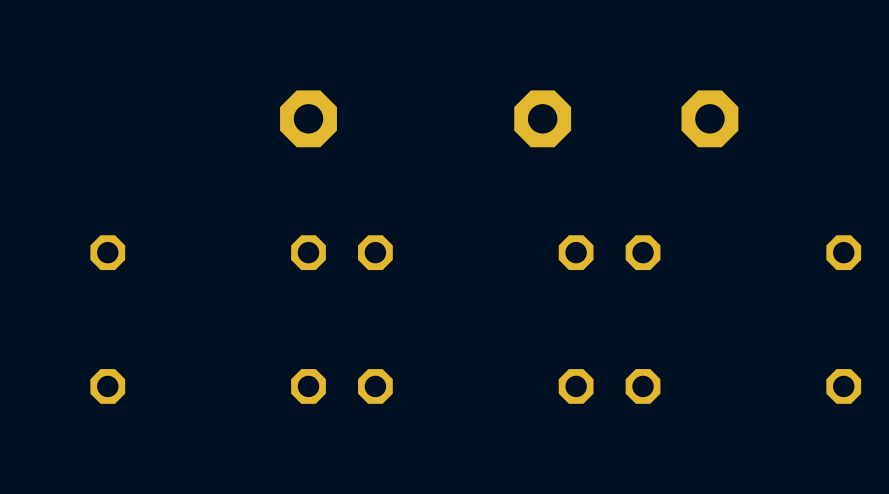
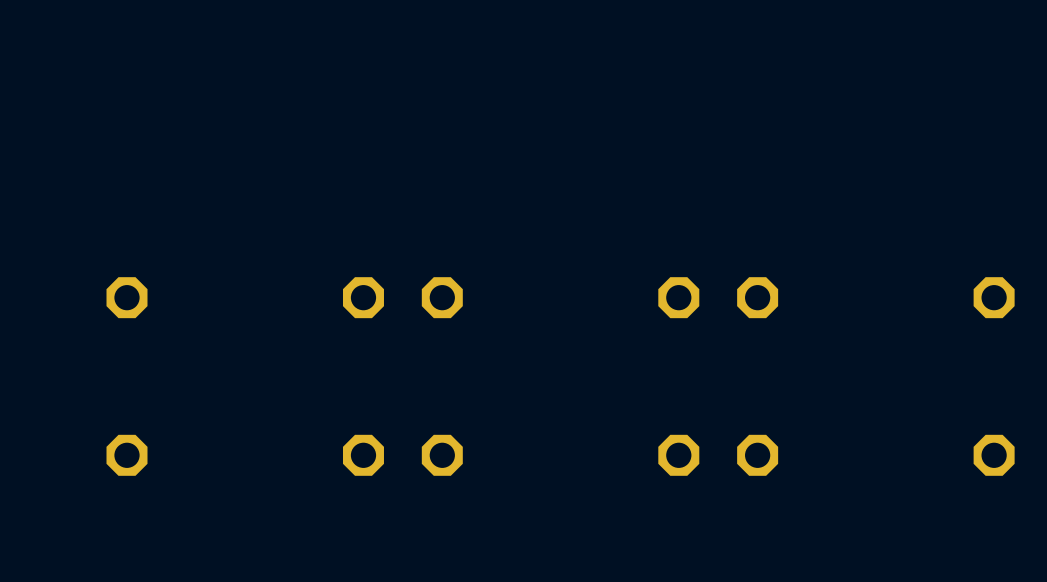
part: (308, 118) -> none
part: (542, 118) -> none
part: (709, 118) -> none

